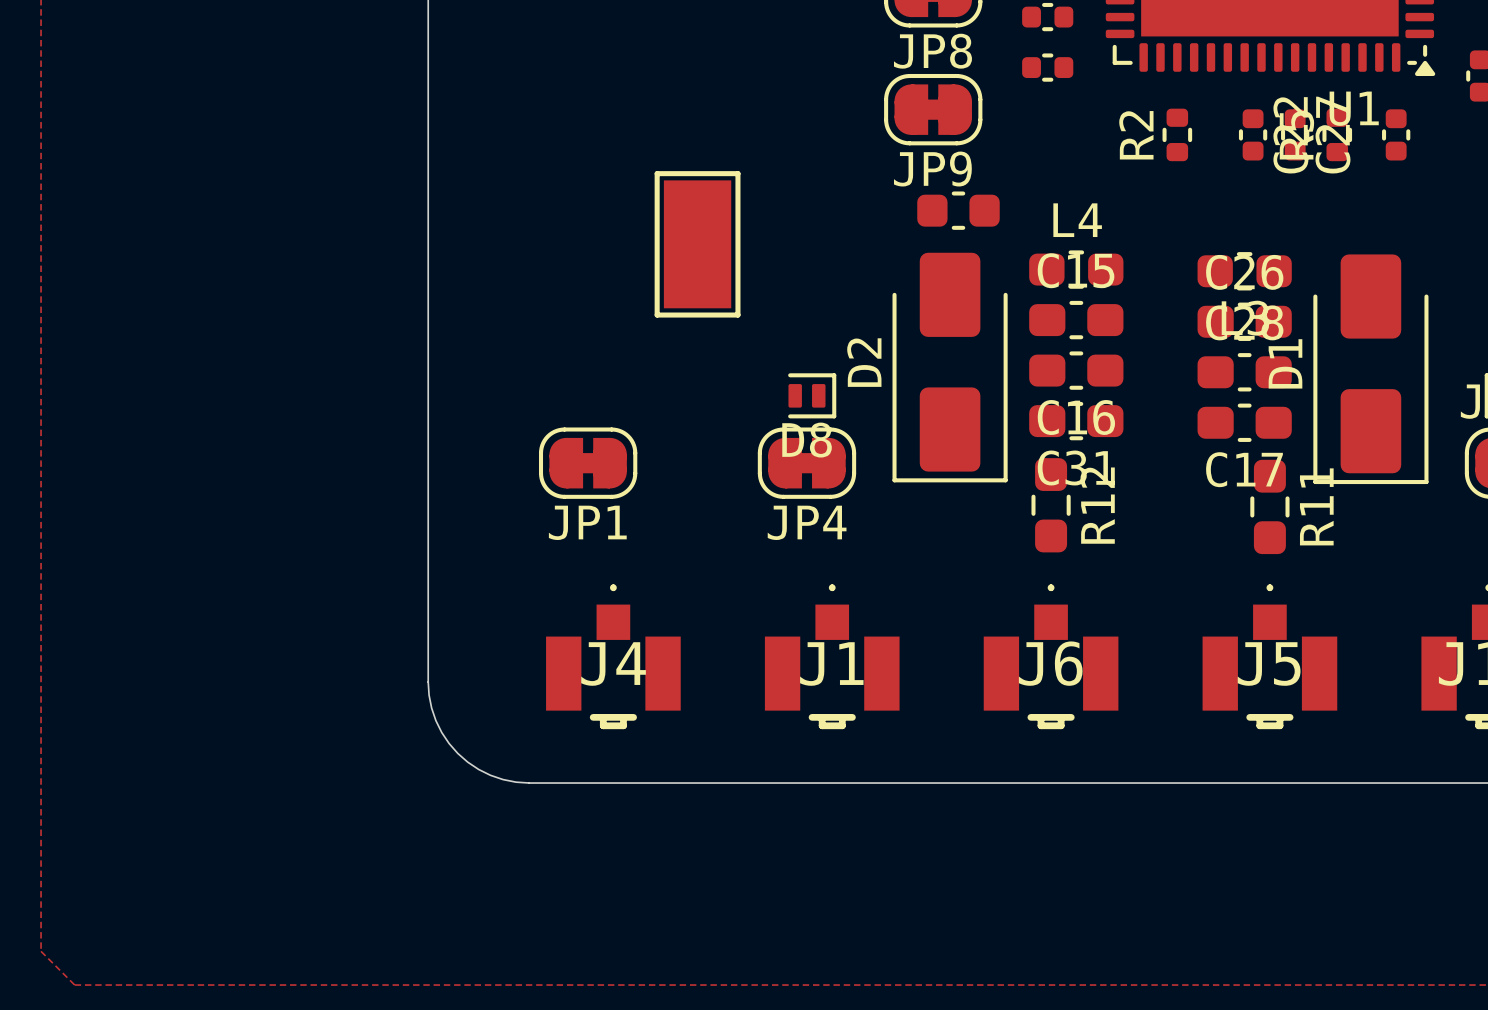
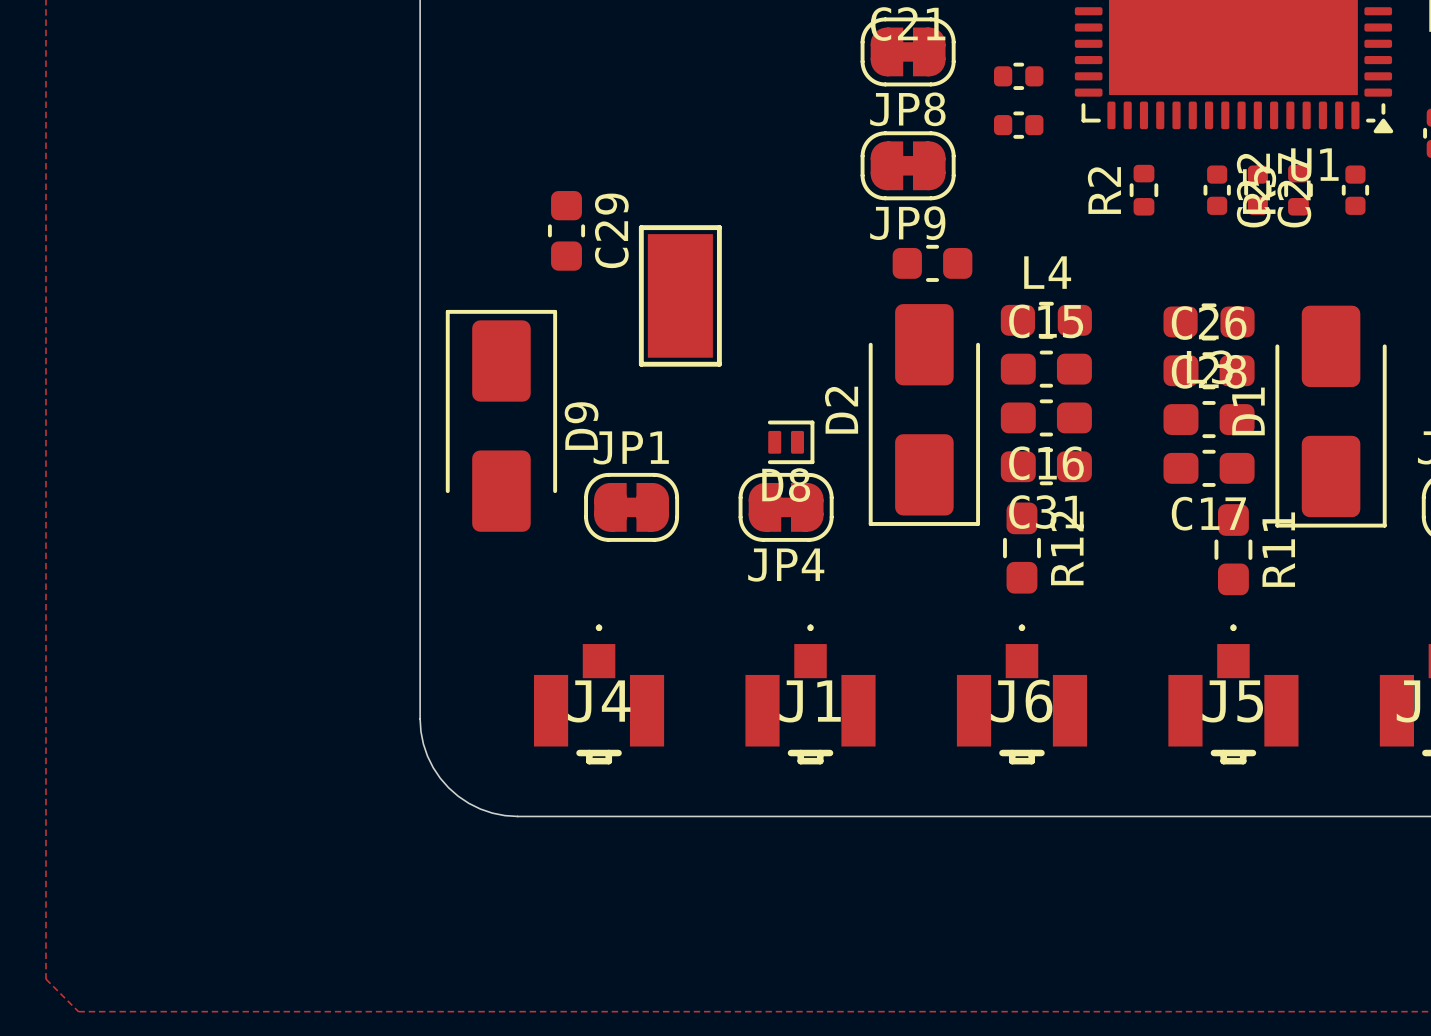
C29: none -> (566, 230)
D9: none -> (501, 420)
JP1 position: (588, 463) -> (631, 507)
JP1 name position: JP1 (587, 522) -> JP1 (631, 447)

